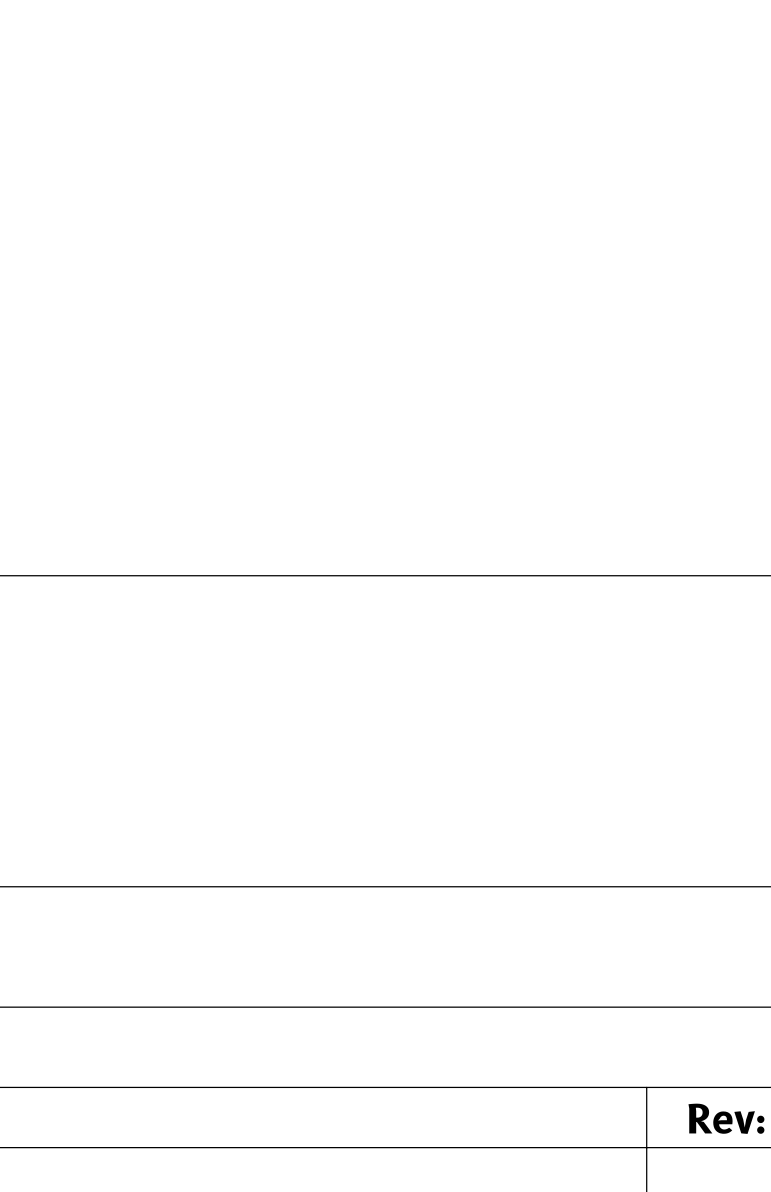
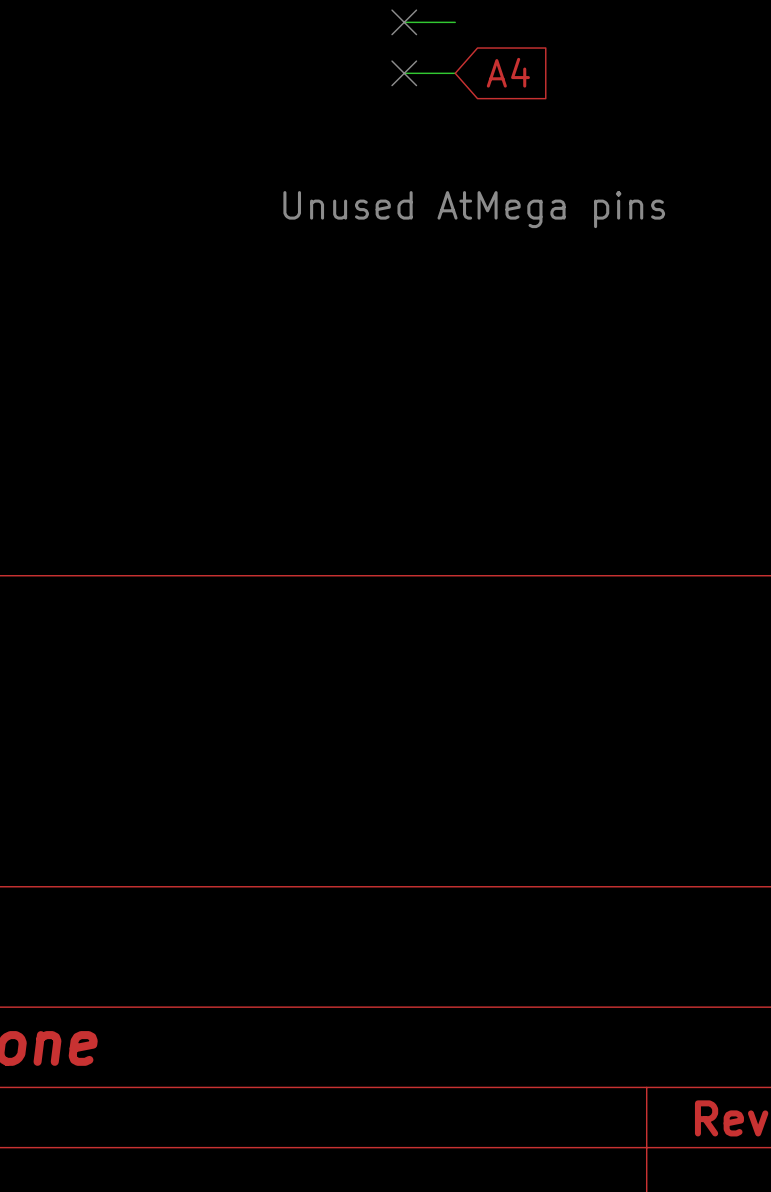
wire: none -> (404, 22) (455, 22)
no-connect mark: none -> (404, 22)
wire: none -> (404, 73) (455, 73)
no-connect mark: none -> (404, 73)
global label: none -> A4 (508, 72)
text: none -> Unused AtMega pins (474, 209)

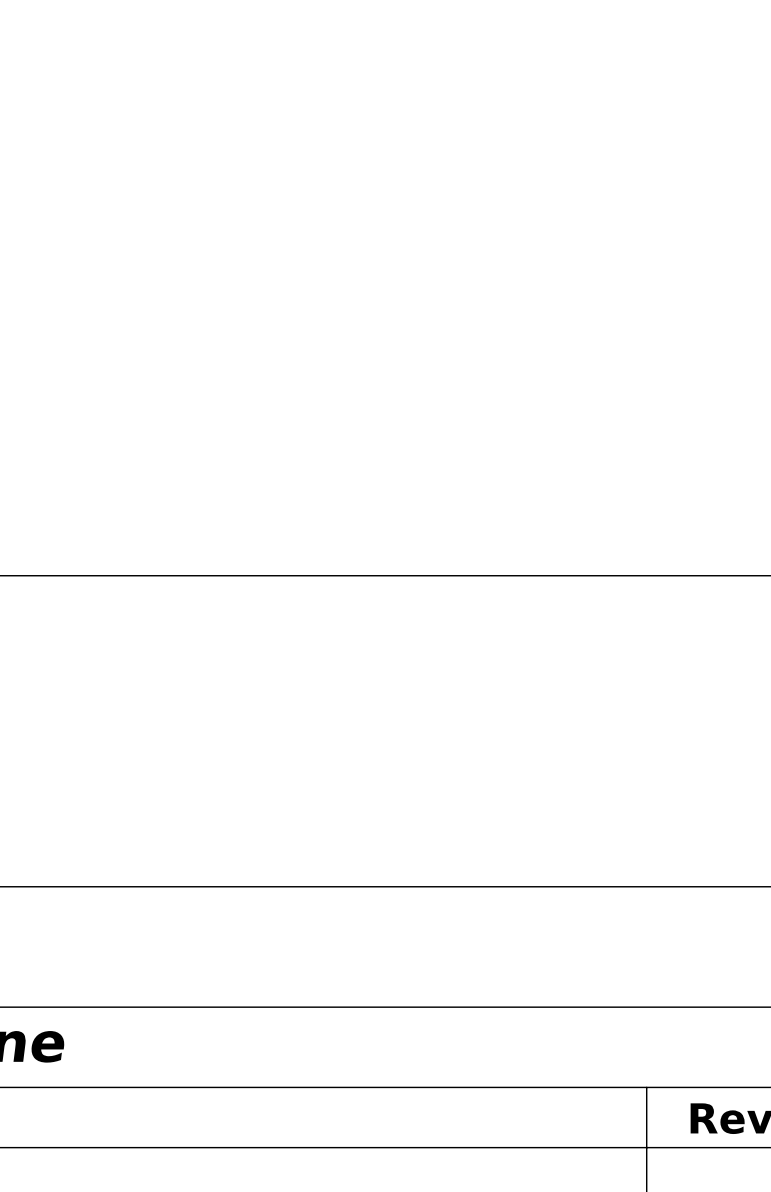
wire: (404, 22) (455, 22) -> none
no-connect mark: (404, 22) -> none
global label: A4 (508, 72) -> none
wire: (404, 73) (455, 73) -> none
no-connect mark: (404, 73) -> none
text: Unused AtMega pins (474, 209) -> none

